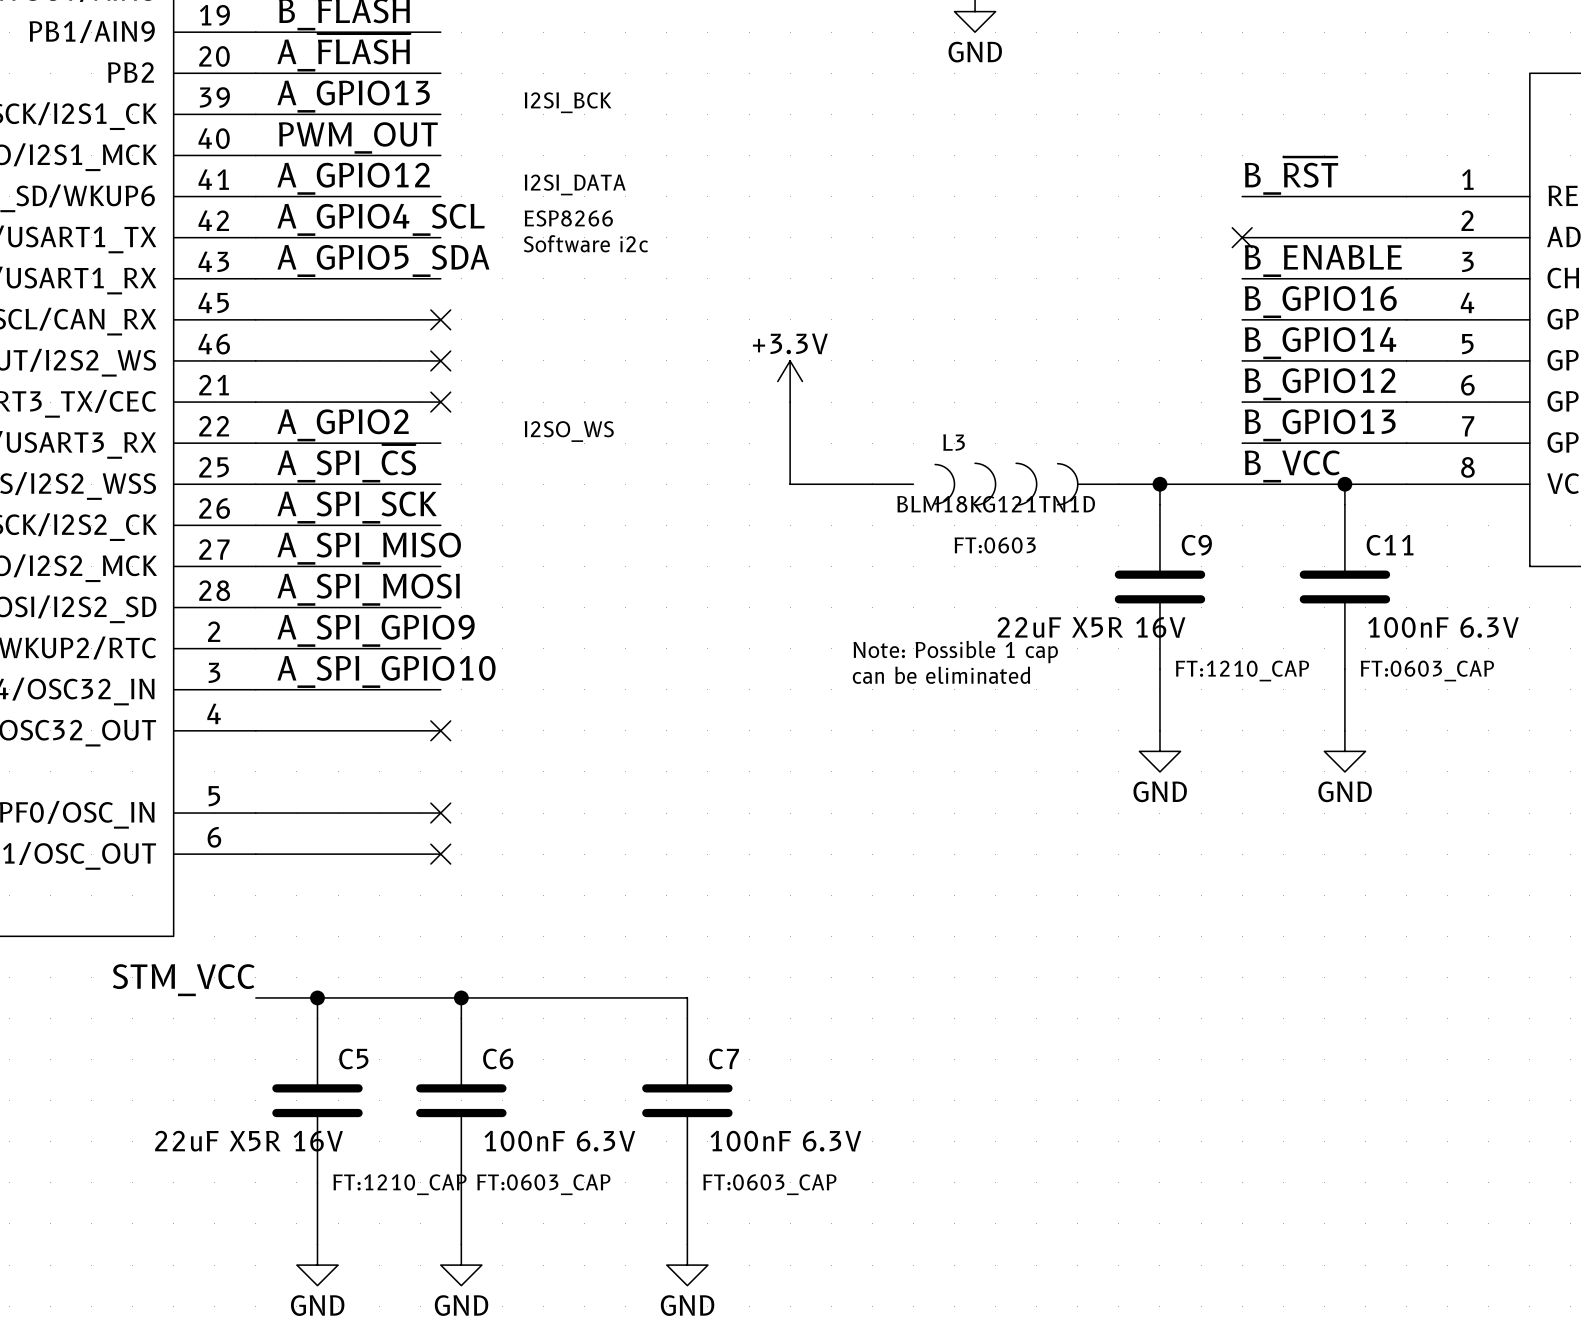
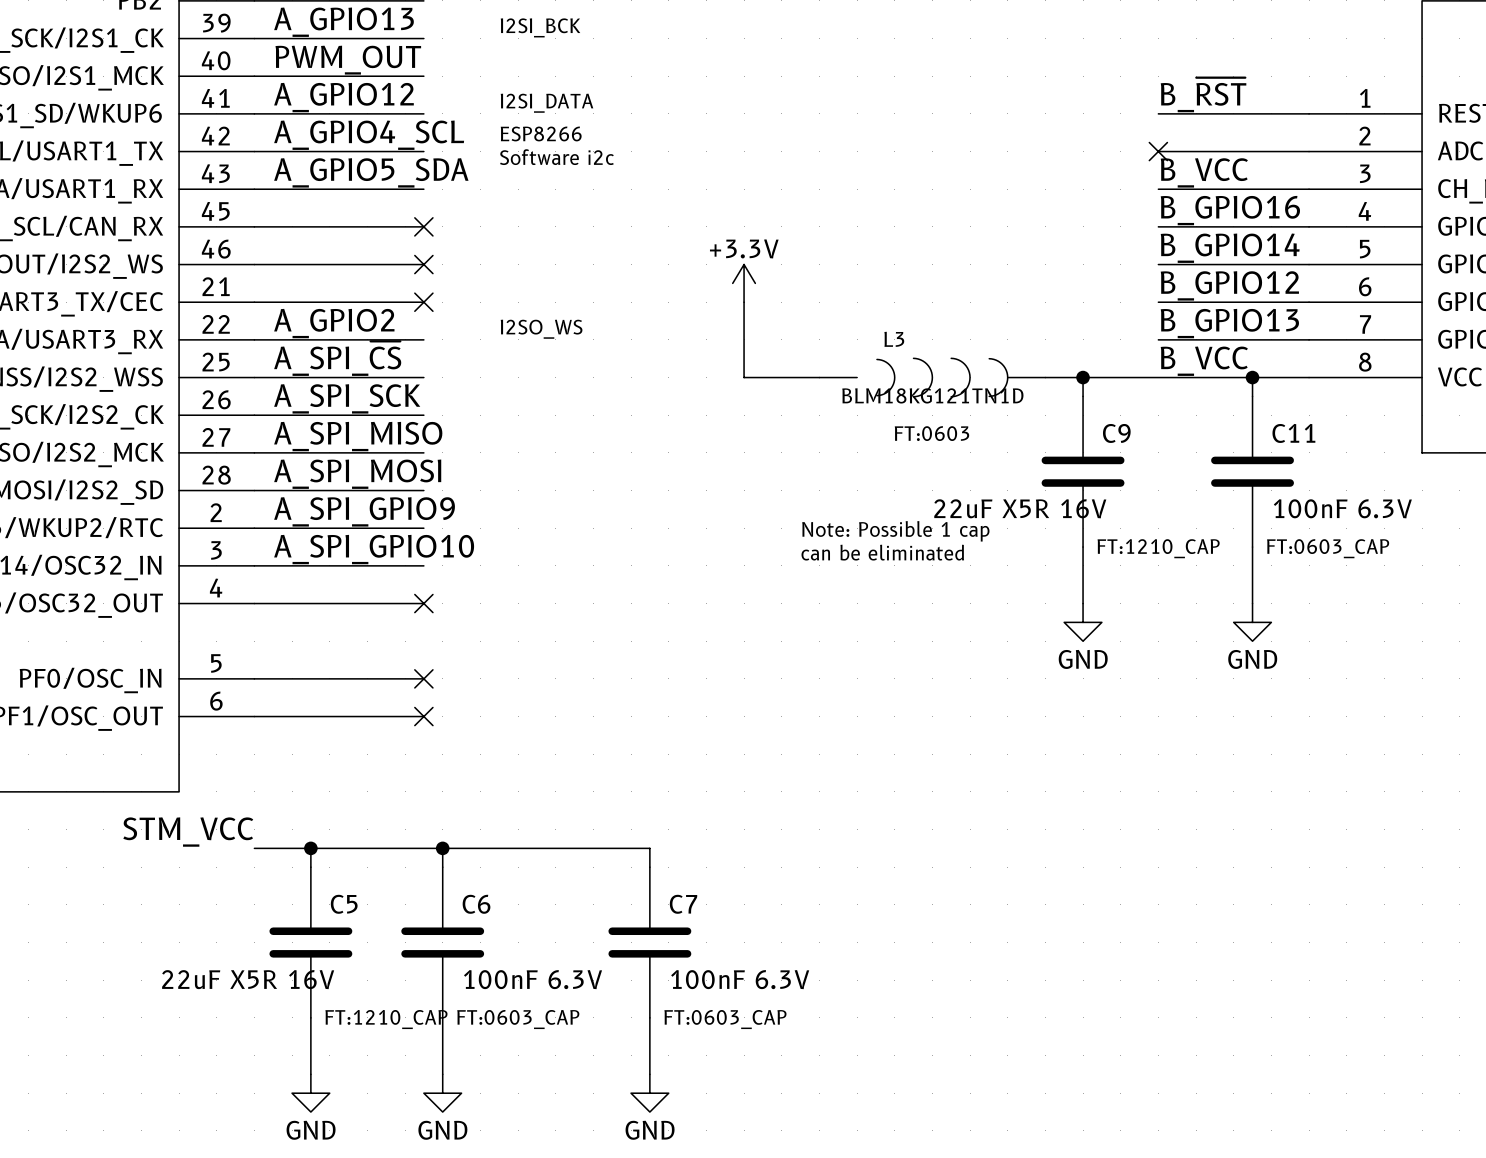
label: B_ENABLE (1323, 260) -> B_VCC (1204, 172)

